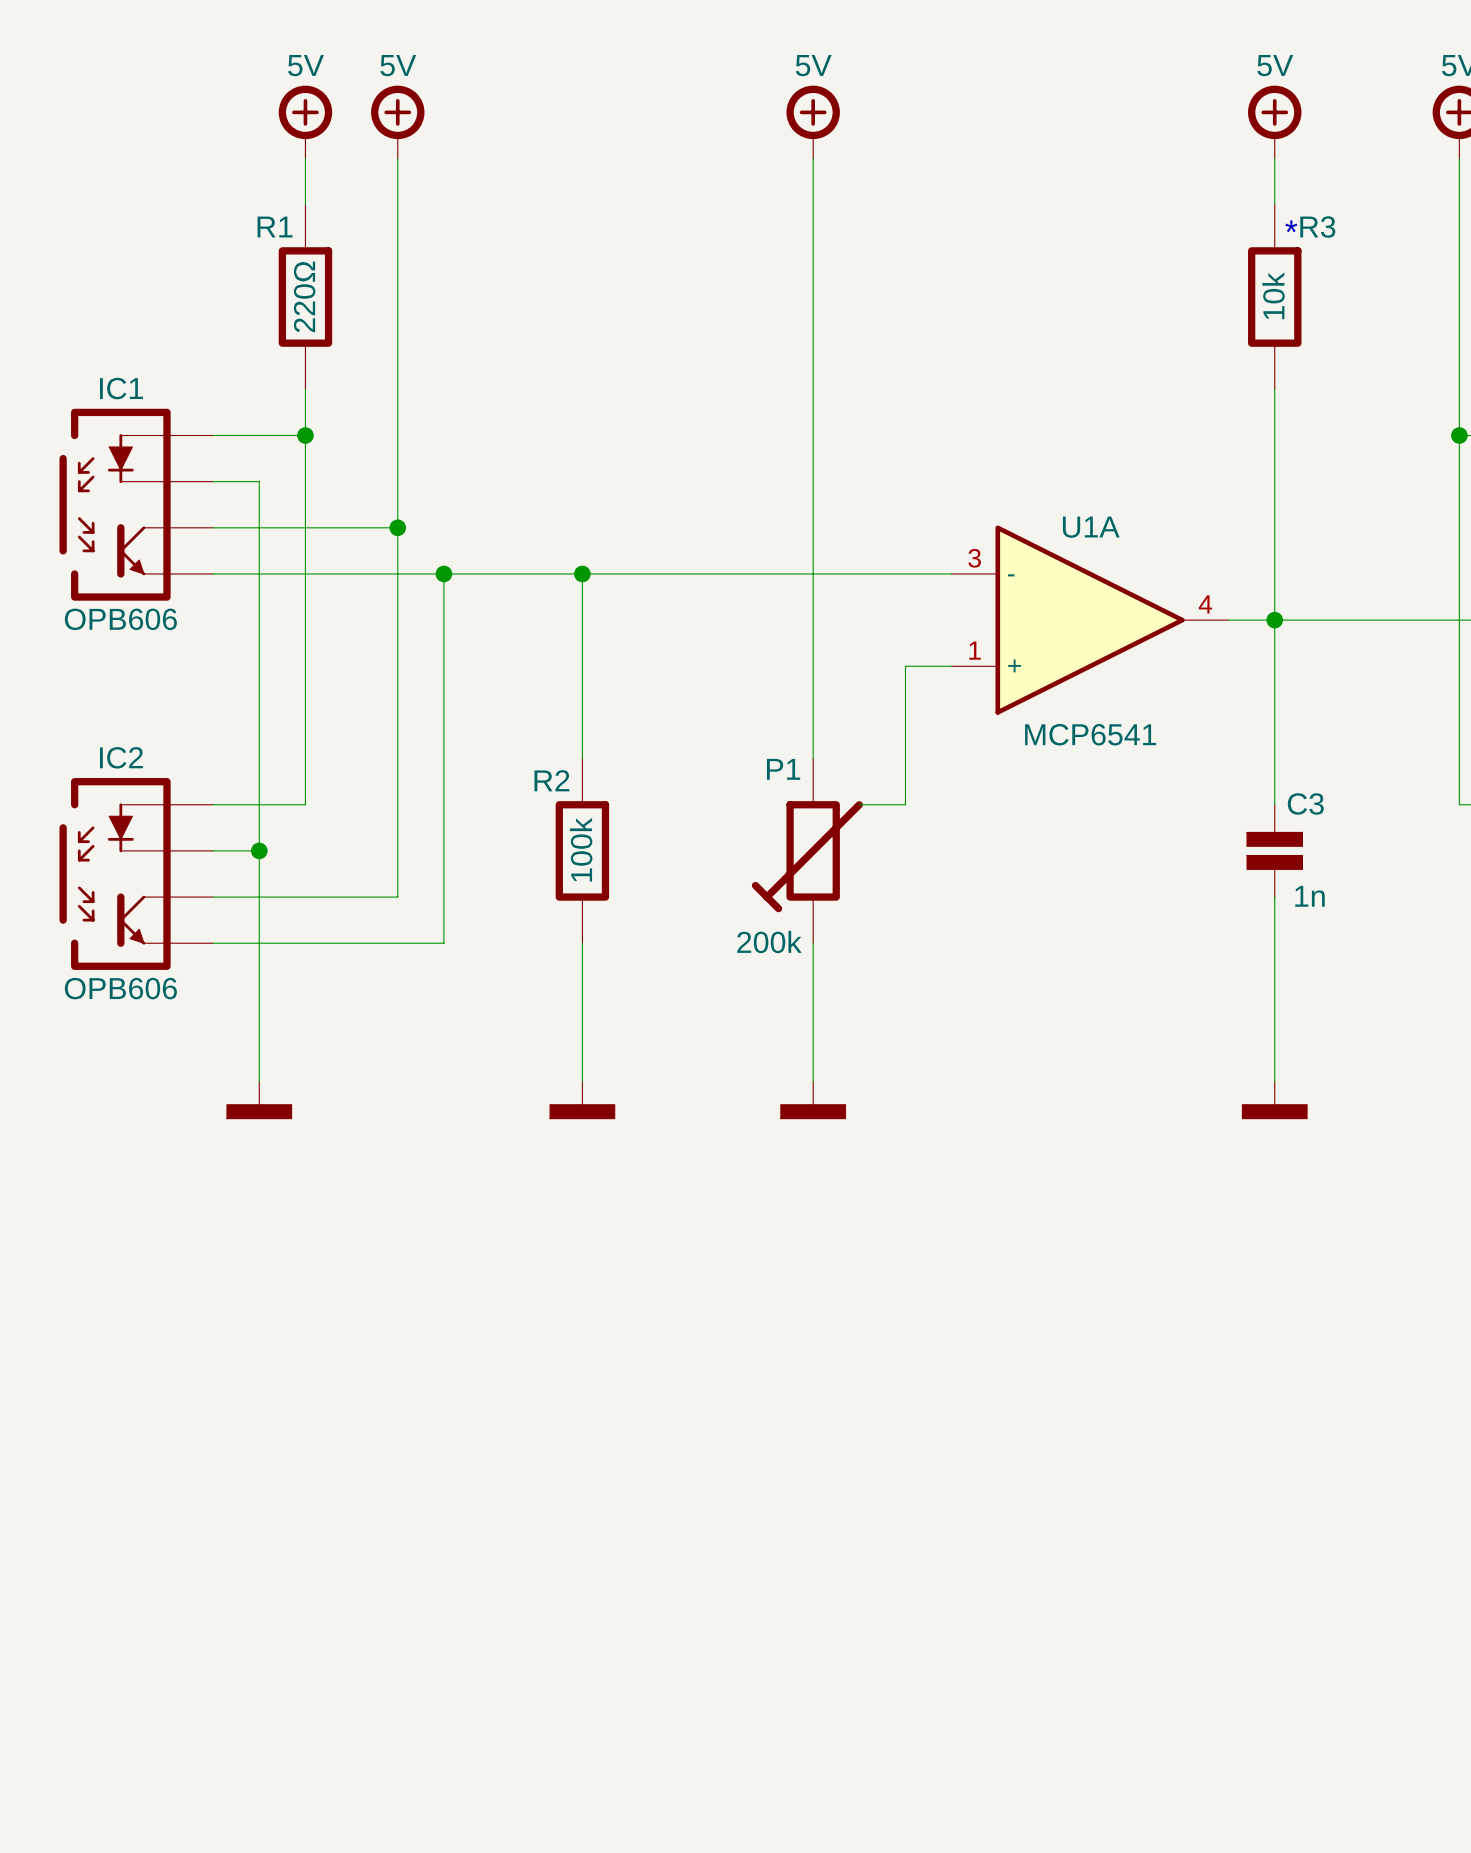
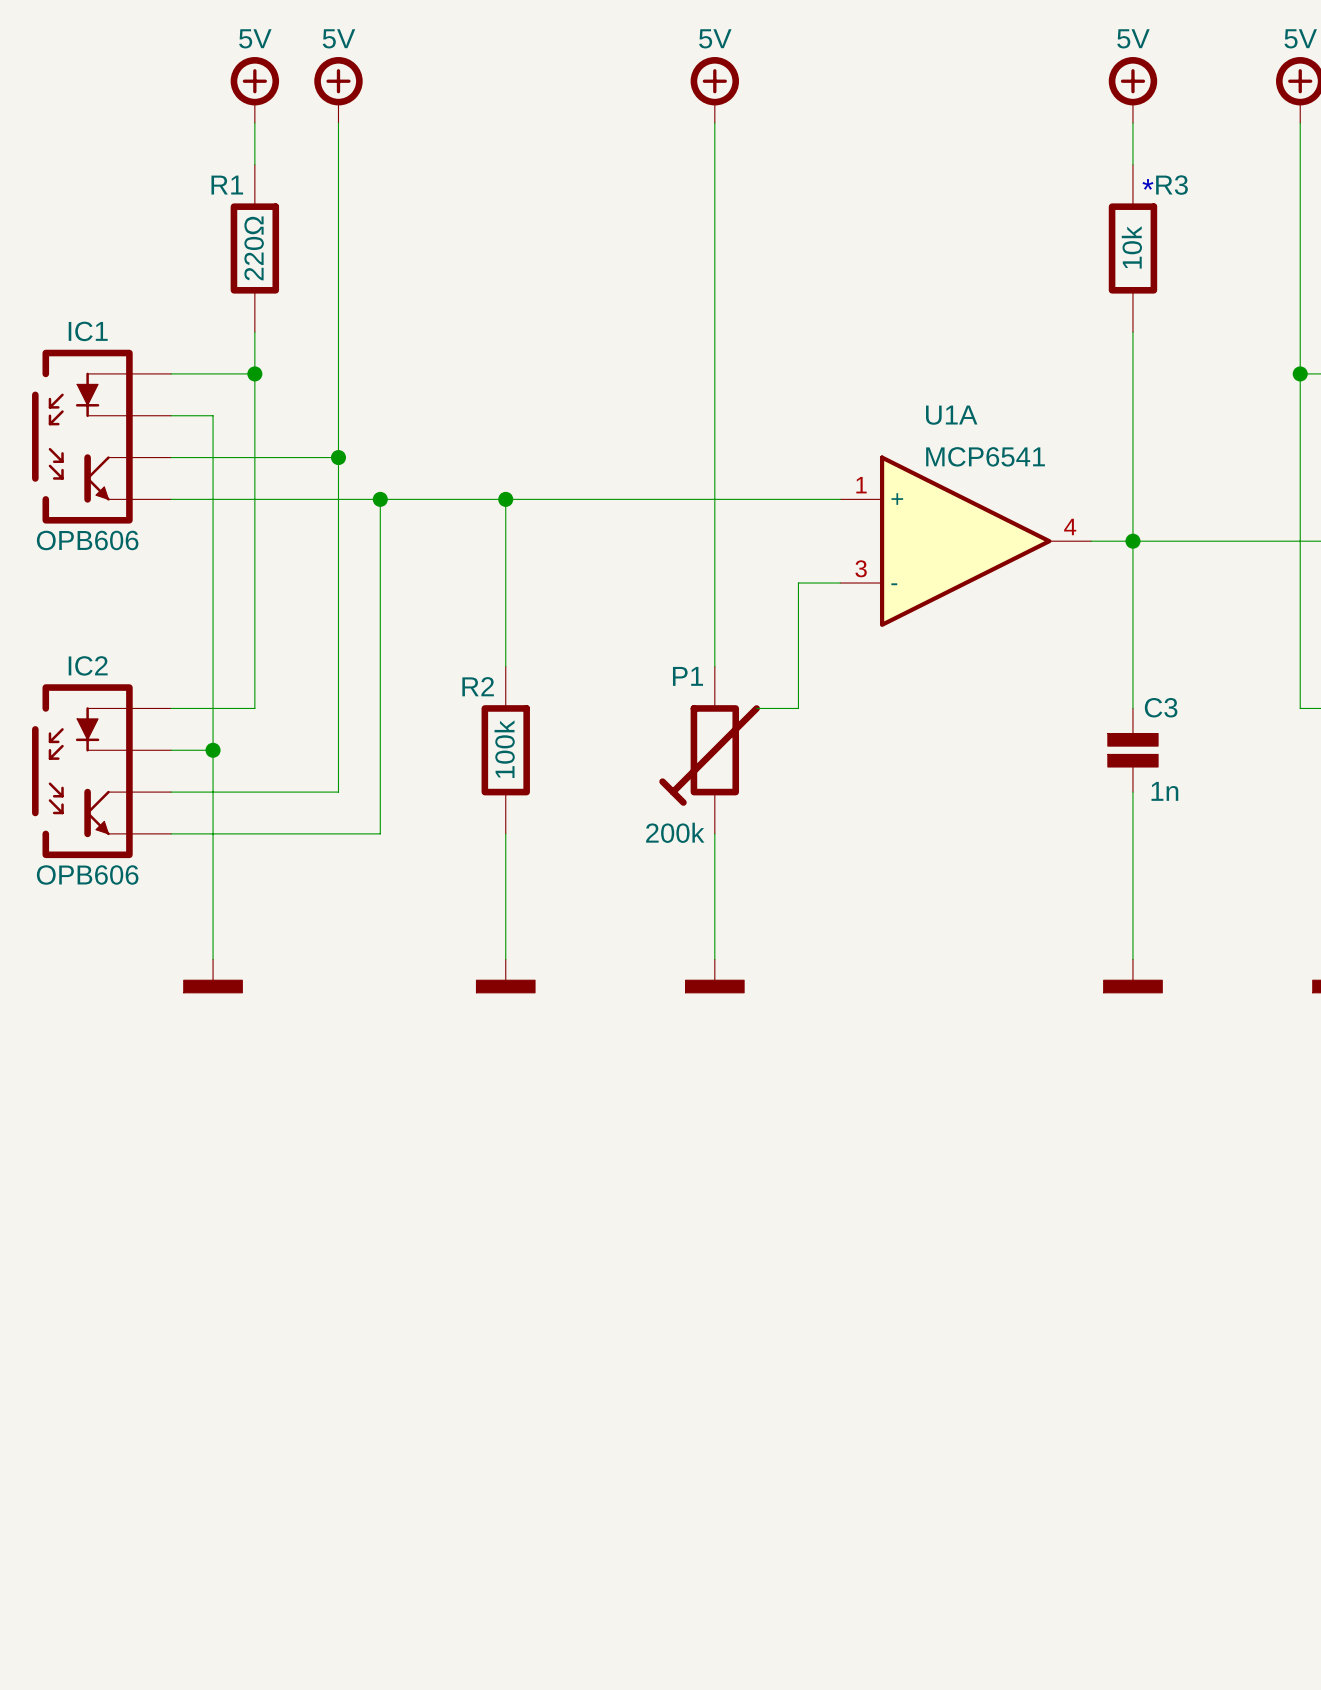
U1A name position: U1A (1091, 527) -> U1A (951, 415)
U1A flip: as is (1090, 620) -> up-down (965, 541)
U1A value position: MCP6541 (1090, 734) -> MCP6541 (985, 456)

